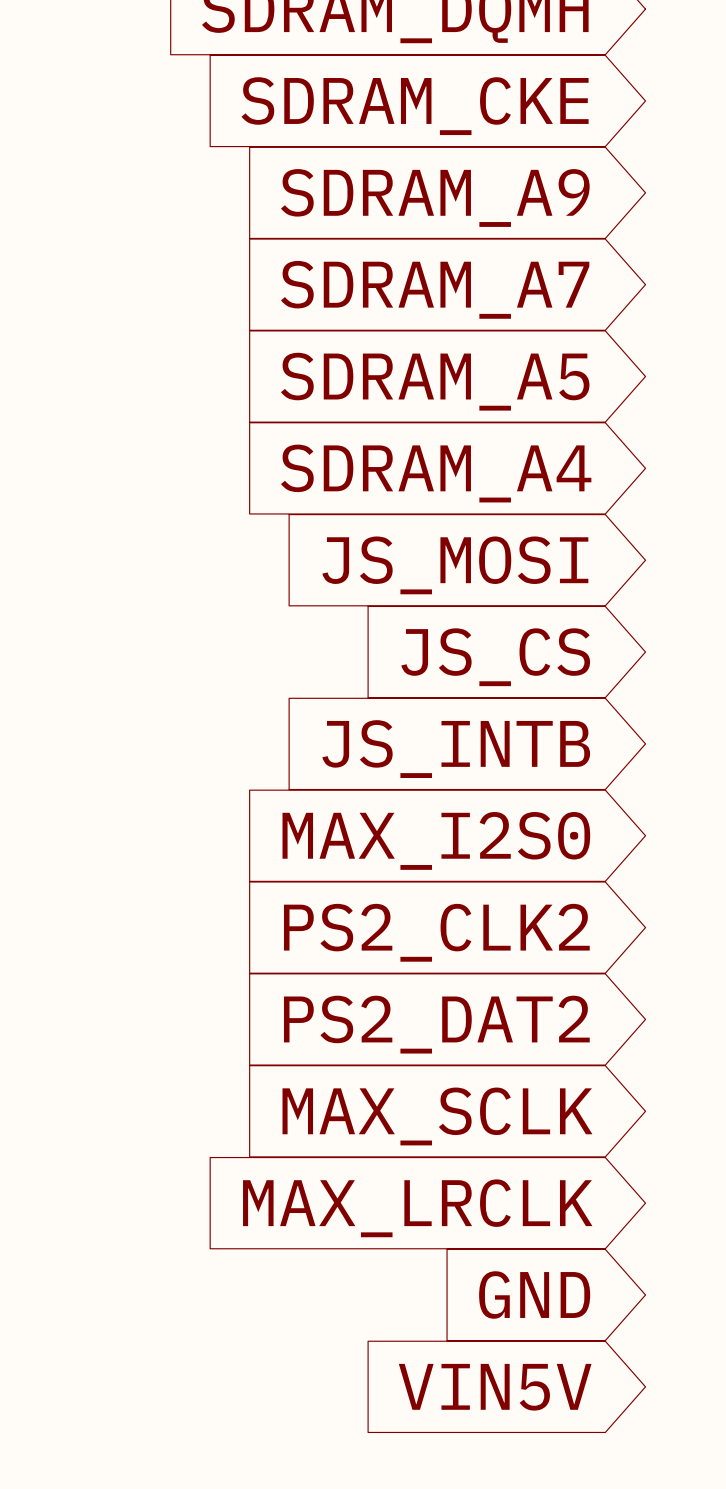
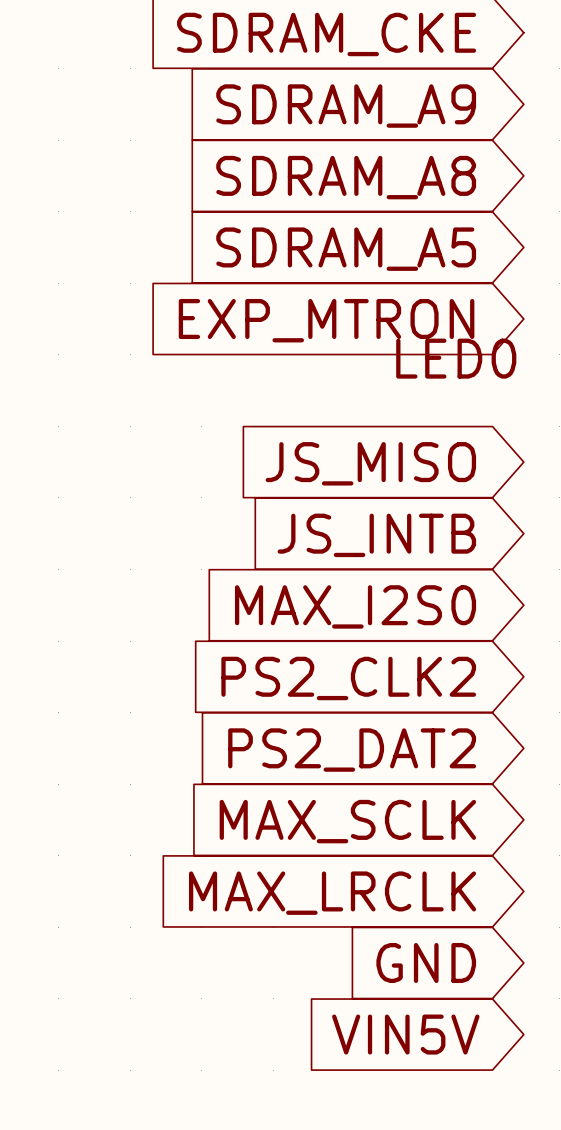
global label: SDRAM_A7 (435, 289) -> SDRAM_A8 (346, 177)
global label: SDRAM_A4 (436, 473) -> EXP_MTRON (326, 320)
label: none -> LED0 (456, 358)
global label: JS_MOSI (455, 565) -> none
global label: JS_CS (495, 657) -> JS_MISO (370, 463)

